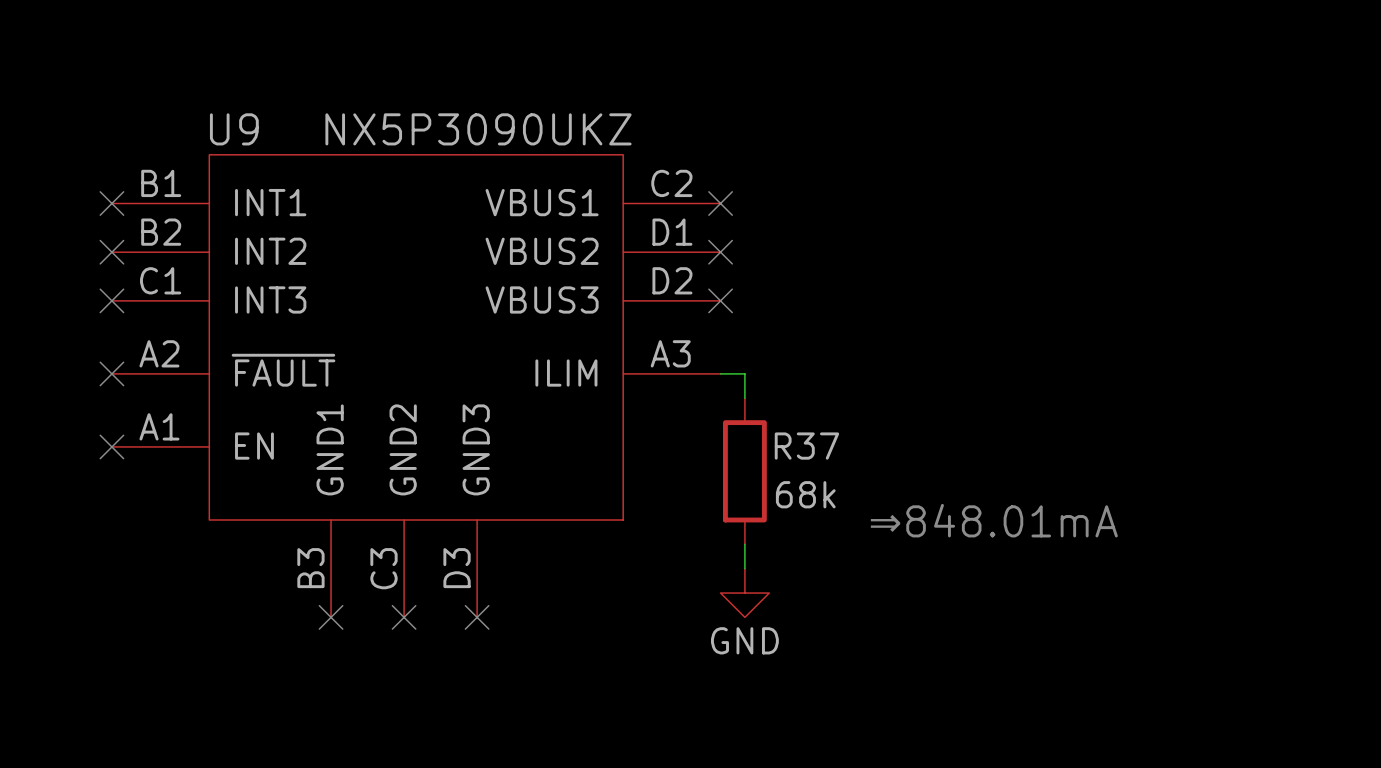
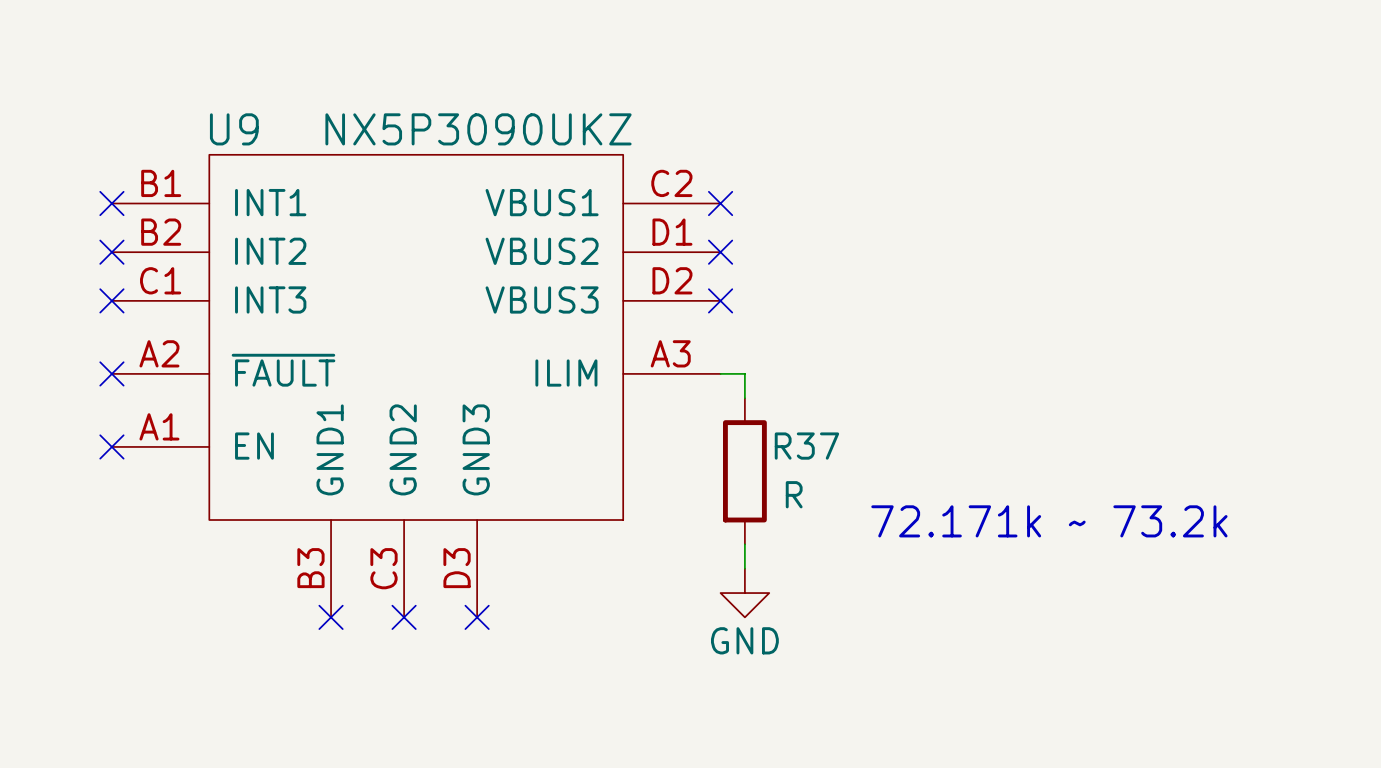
R37 value: 68k (805, 494) -> R (794, 494)
text: ⇒848.01mA (993, 520) -> 72.171k ~ 73.2k (1049, 521)

